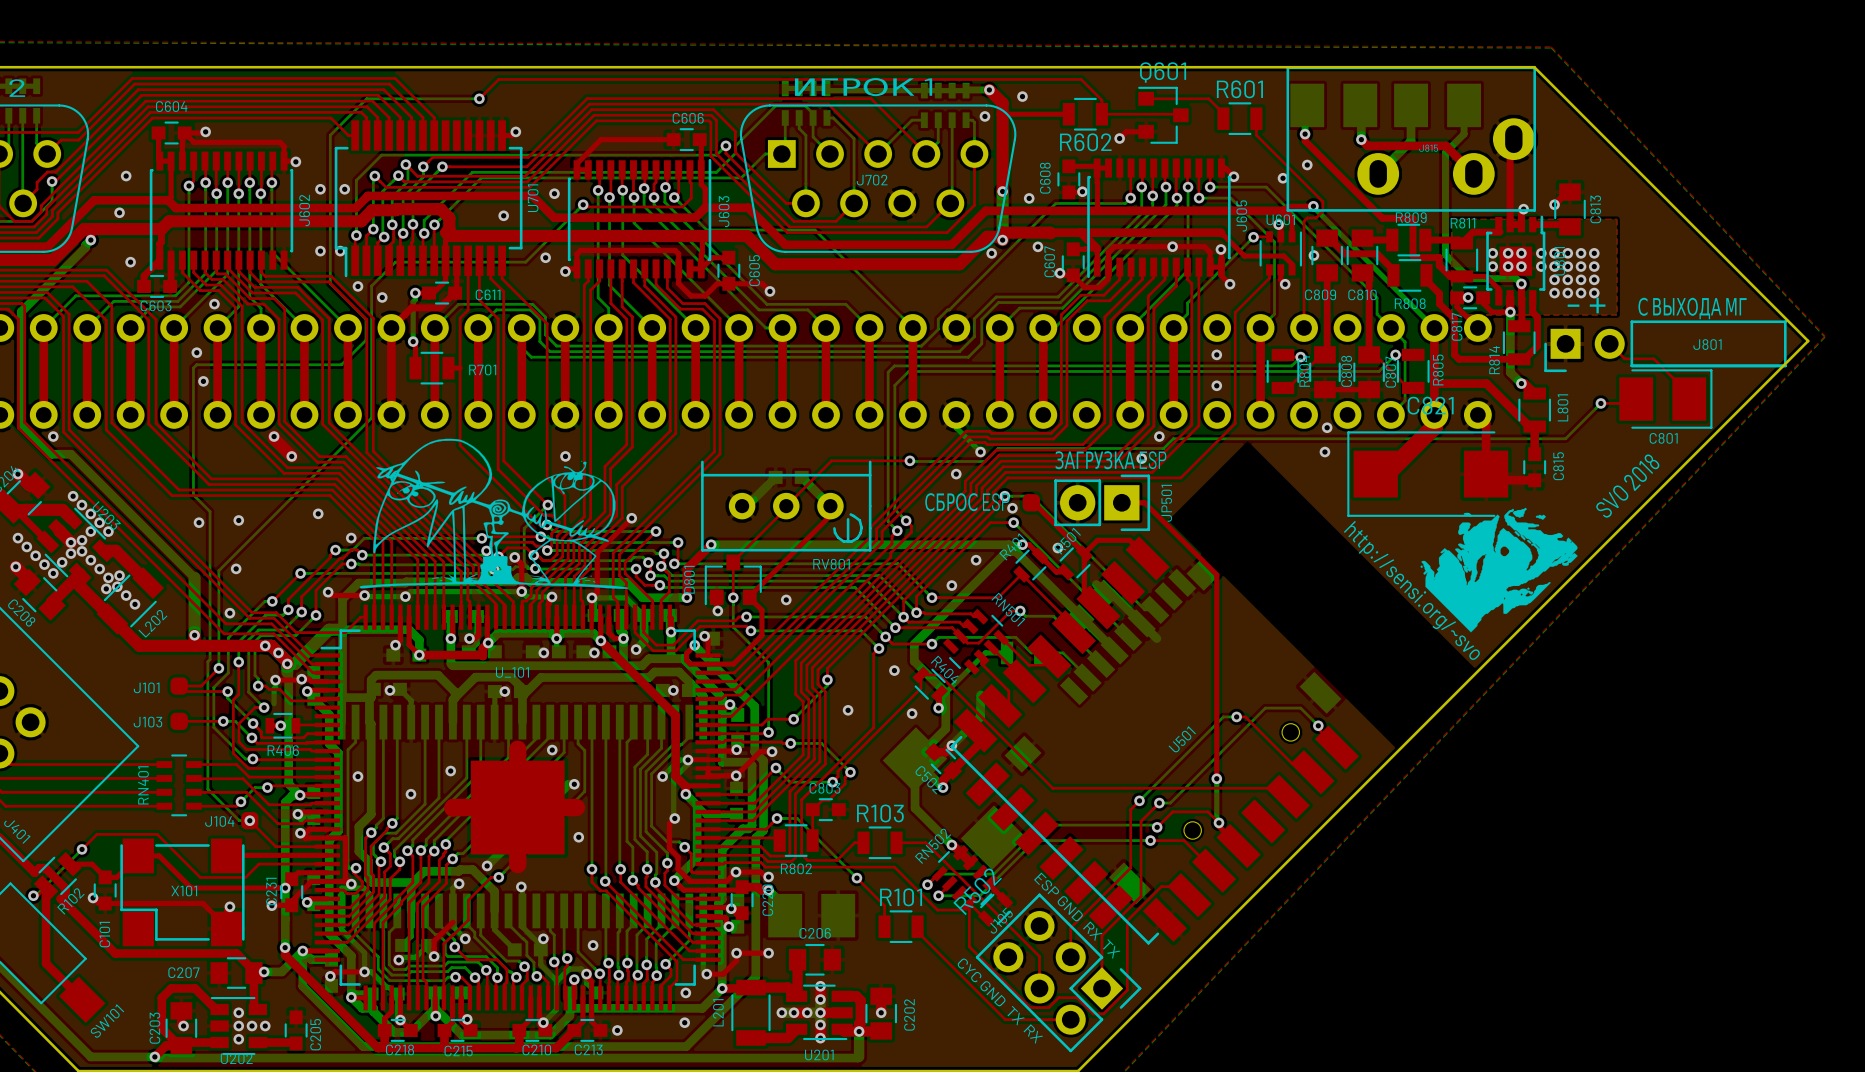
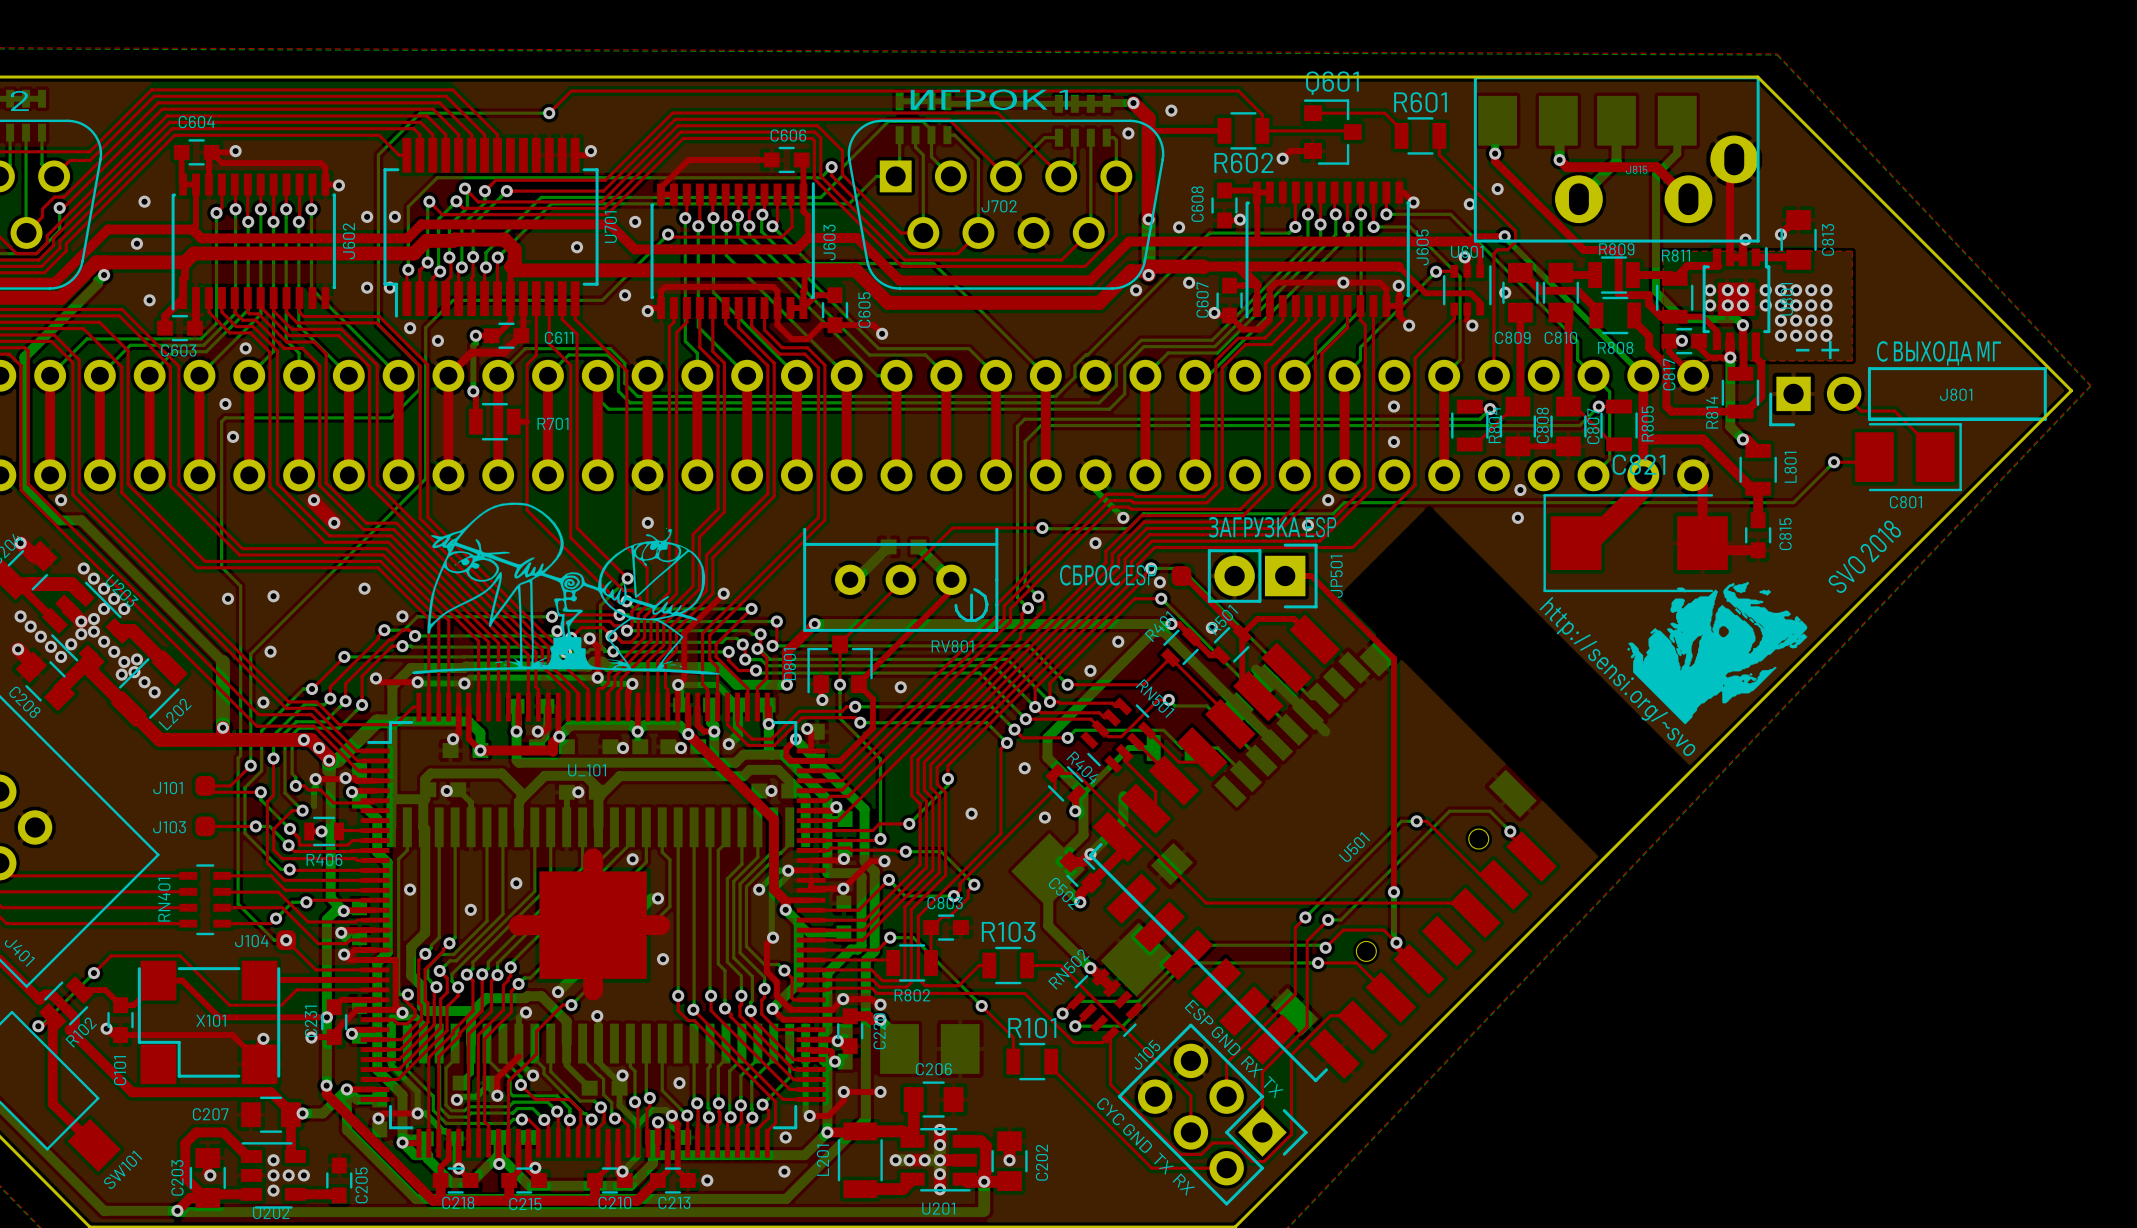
top track: (990, 882) (990, 885) (1004, 900) -> none
top track: (969, 903) (986, 918) -> none
R502: (995, 909) -> none

